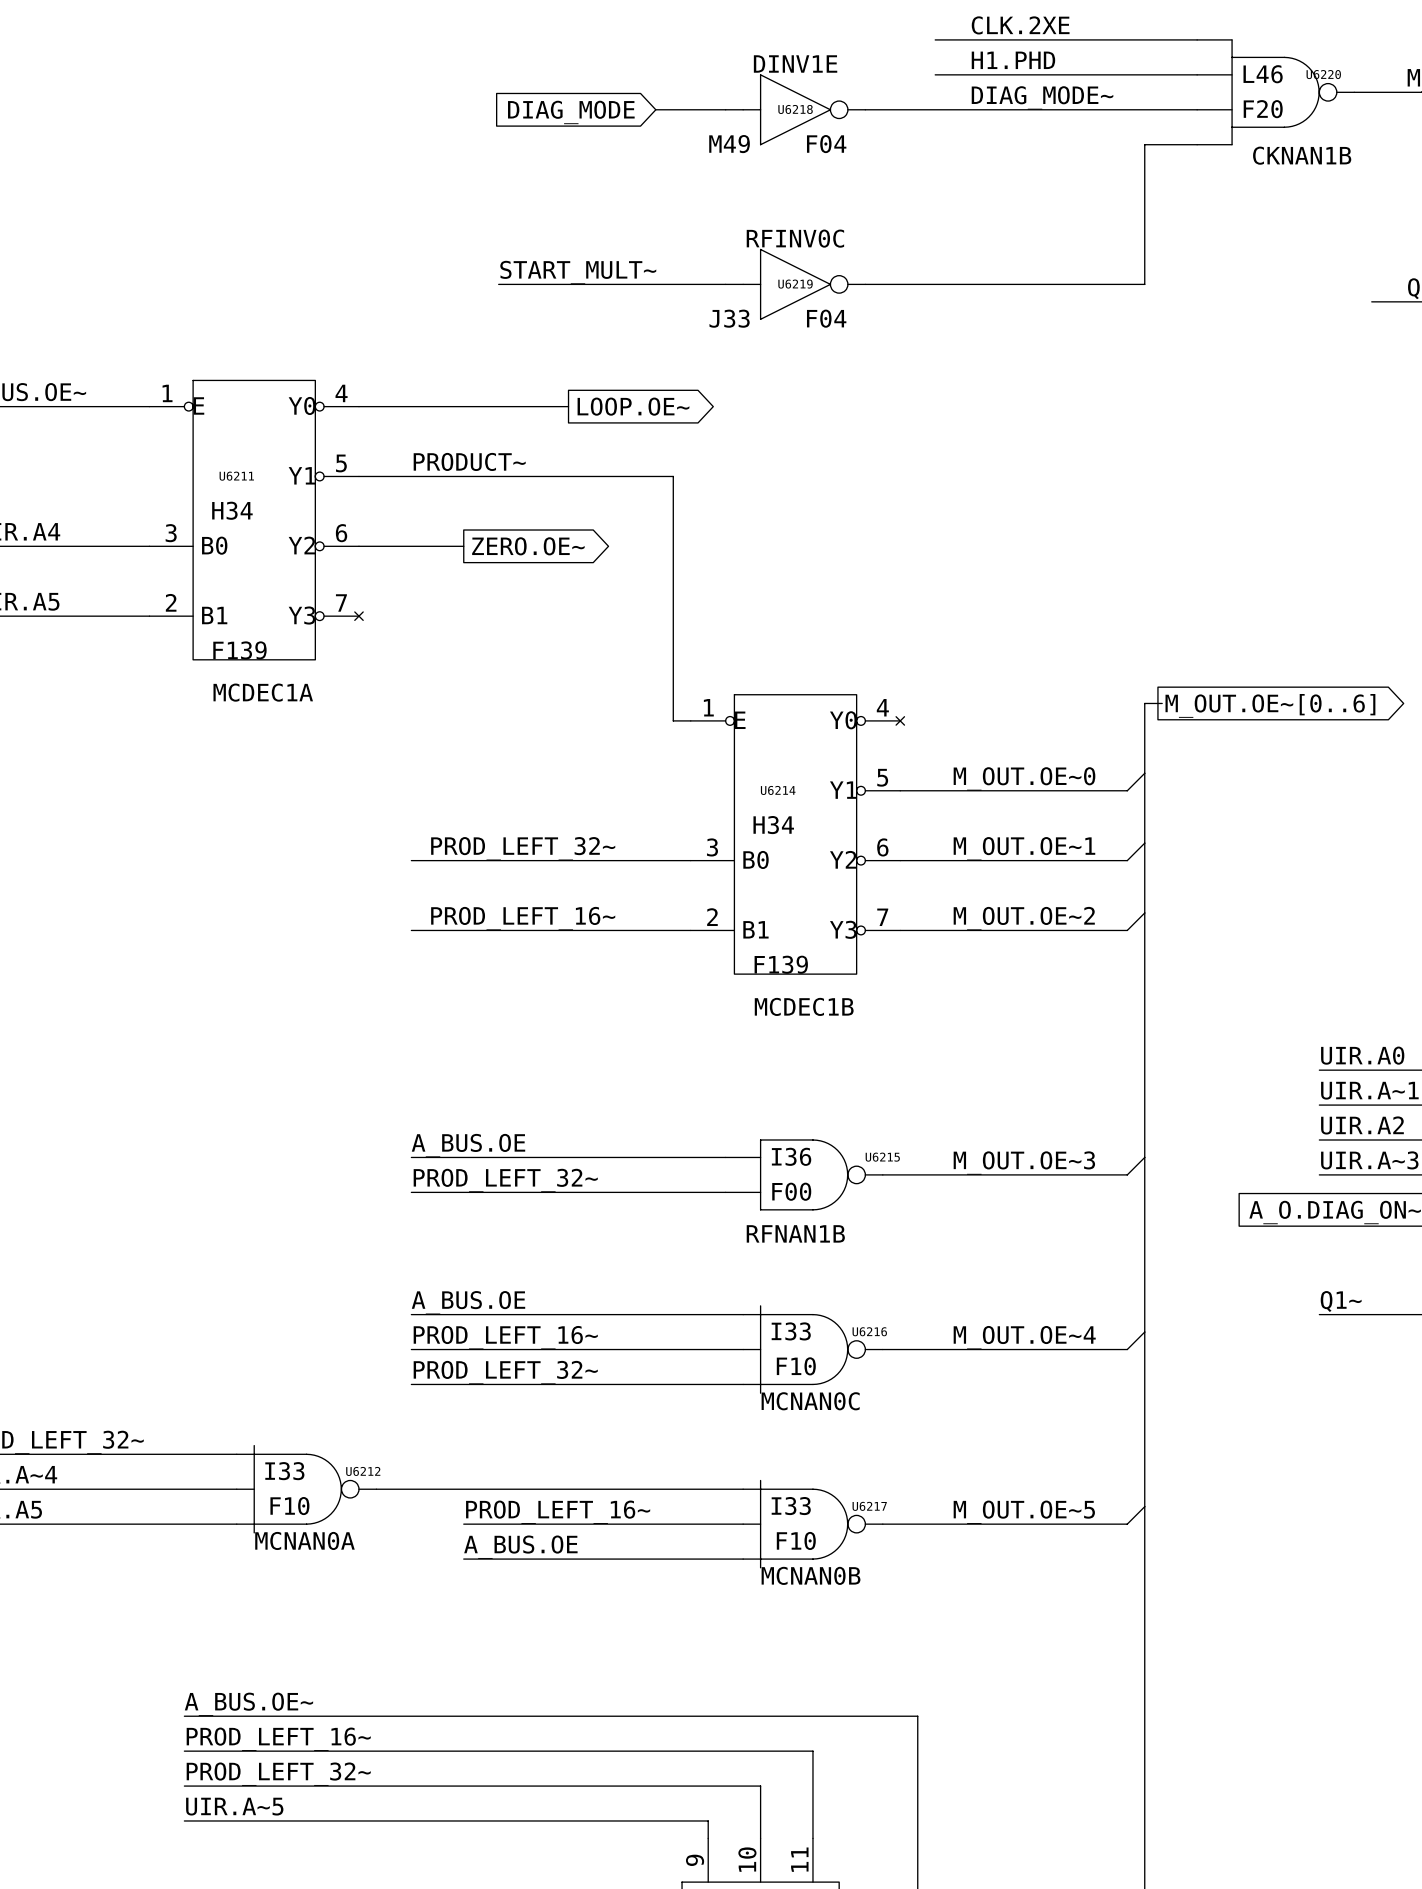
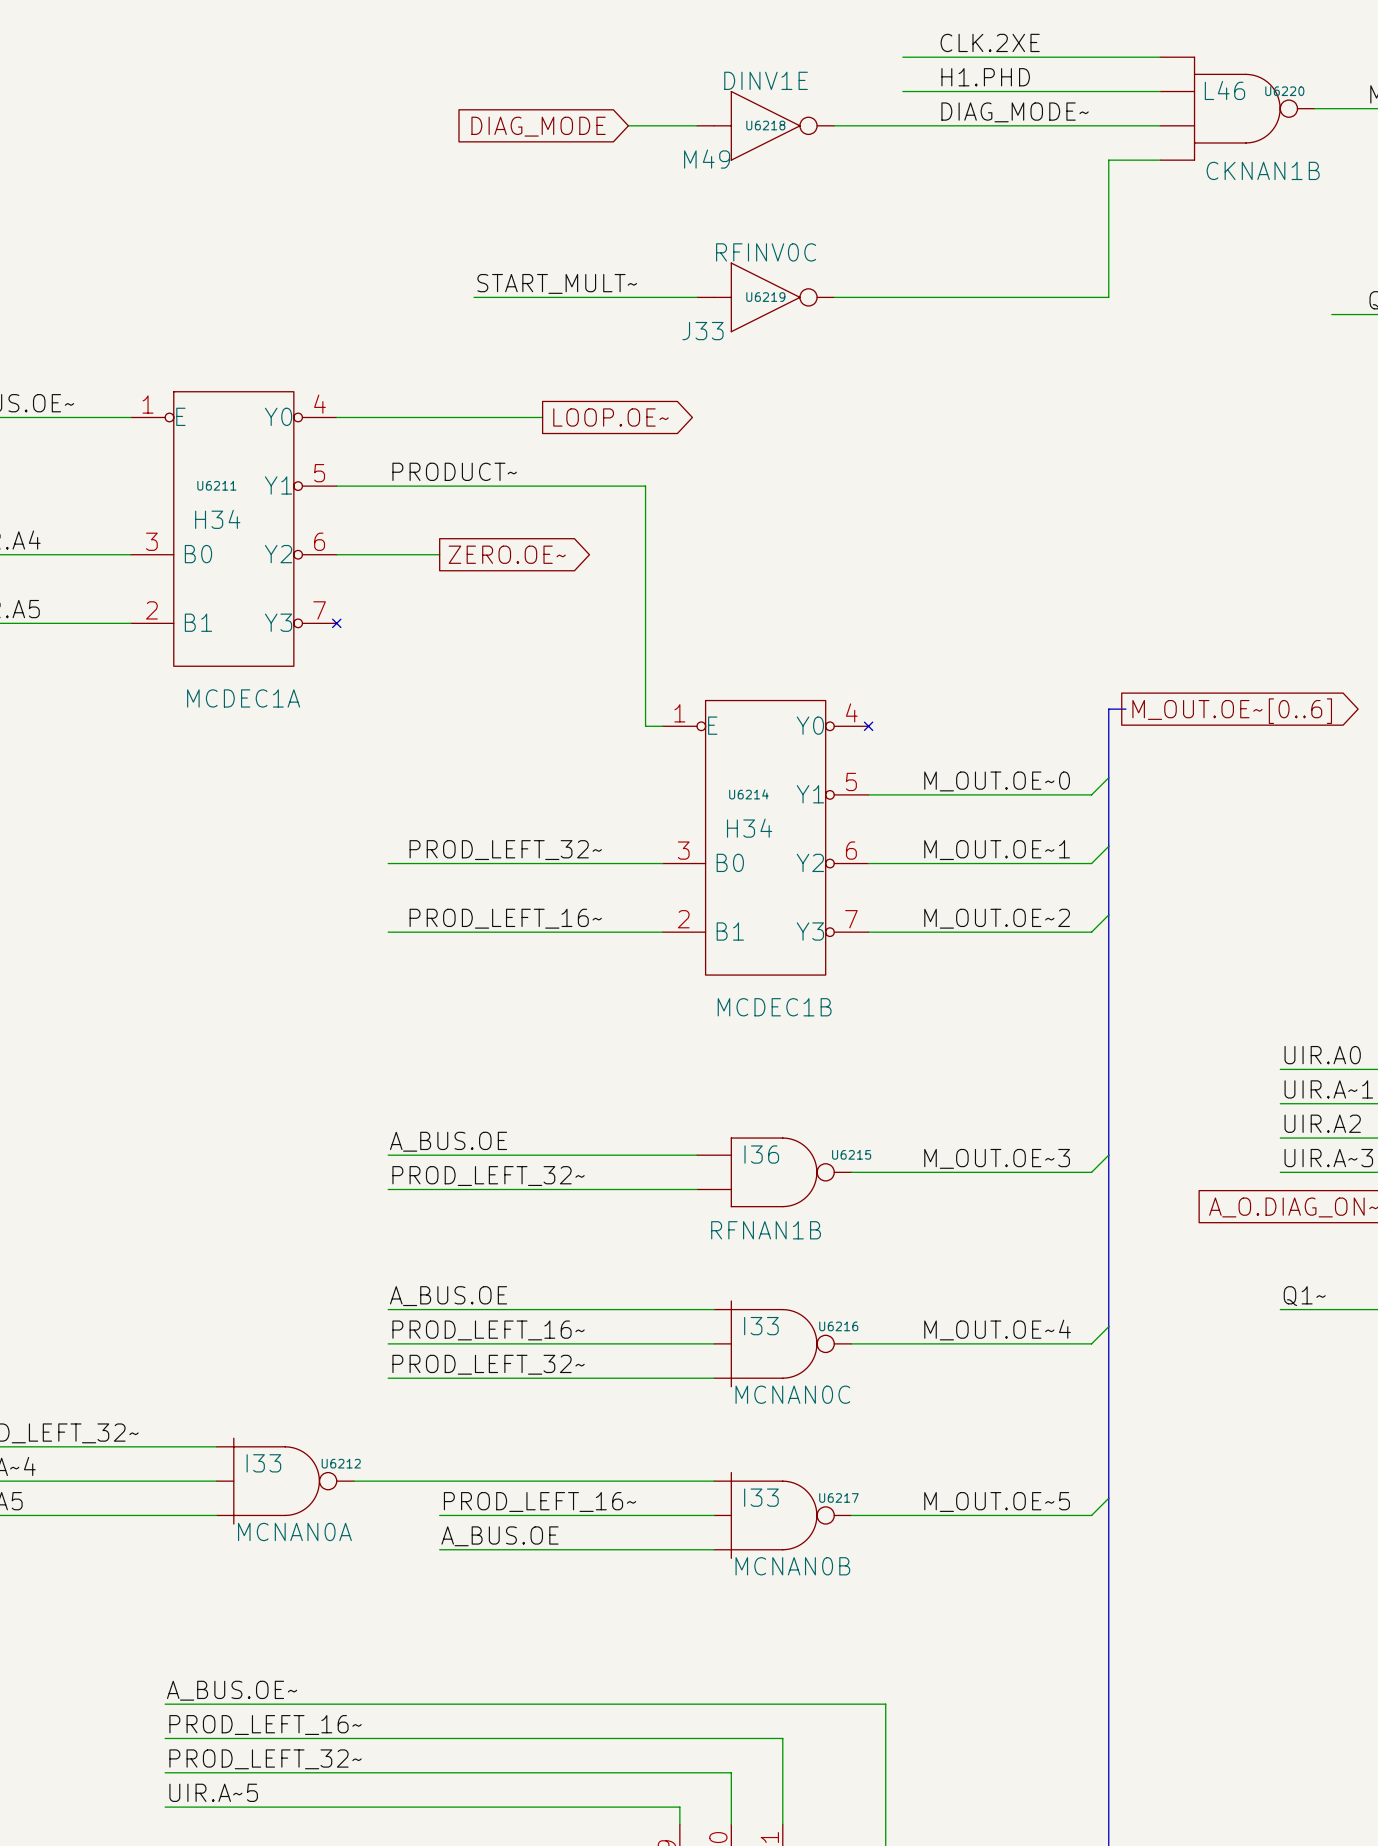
U6220 value: F20 (1263, 109) -> none
U6218 value: F04 (826, 144) -> none
U6219 value: F04 (826, 318) -> none
U6211 value: F139 (239, 650) -> none
U6214 value: F139 (781, 964) -> none
U6215 value: F00 (791, 1191) -> none
U6216 value: F10 (796, 1366) -> none
U6212 value: F10 (289, 1506) -> none
U6217 value: F10 (796, 1540) -> none

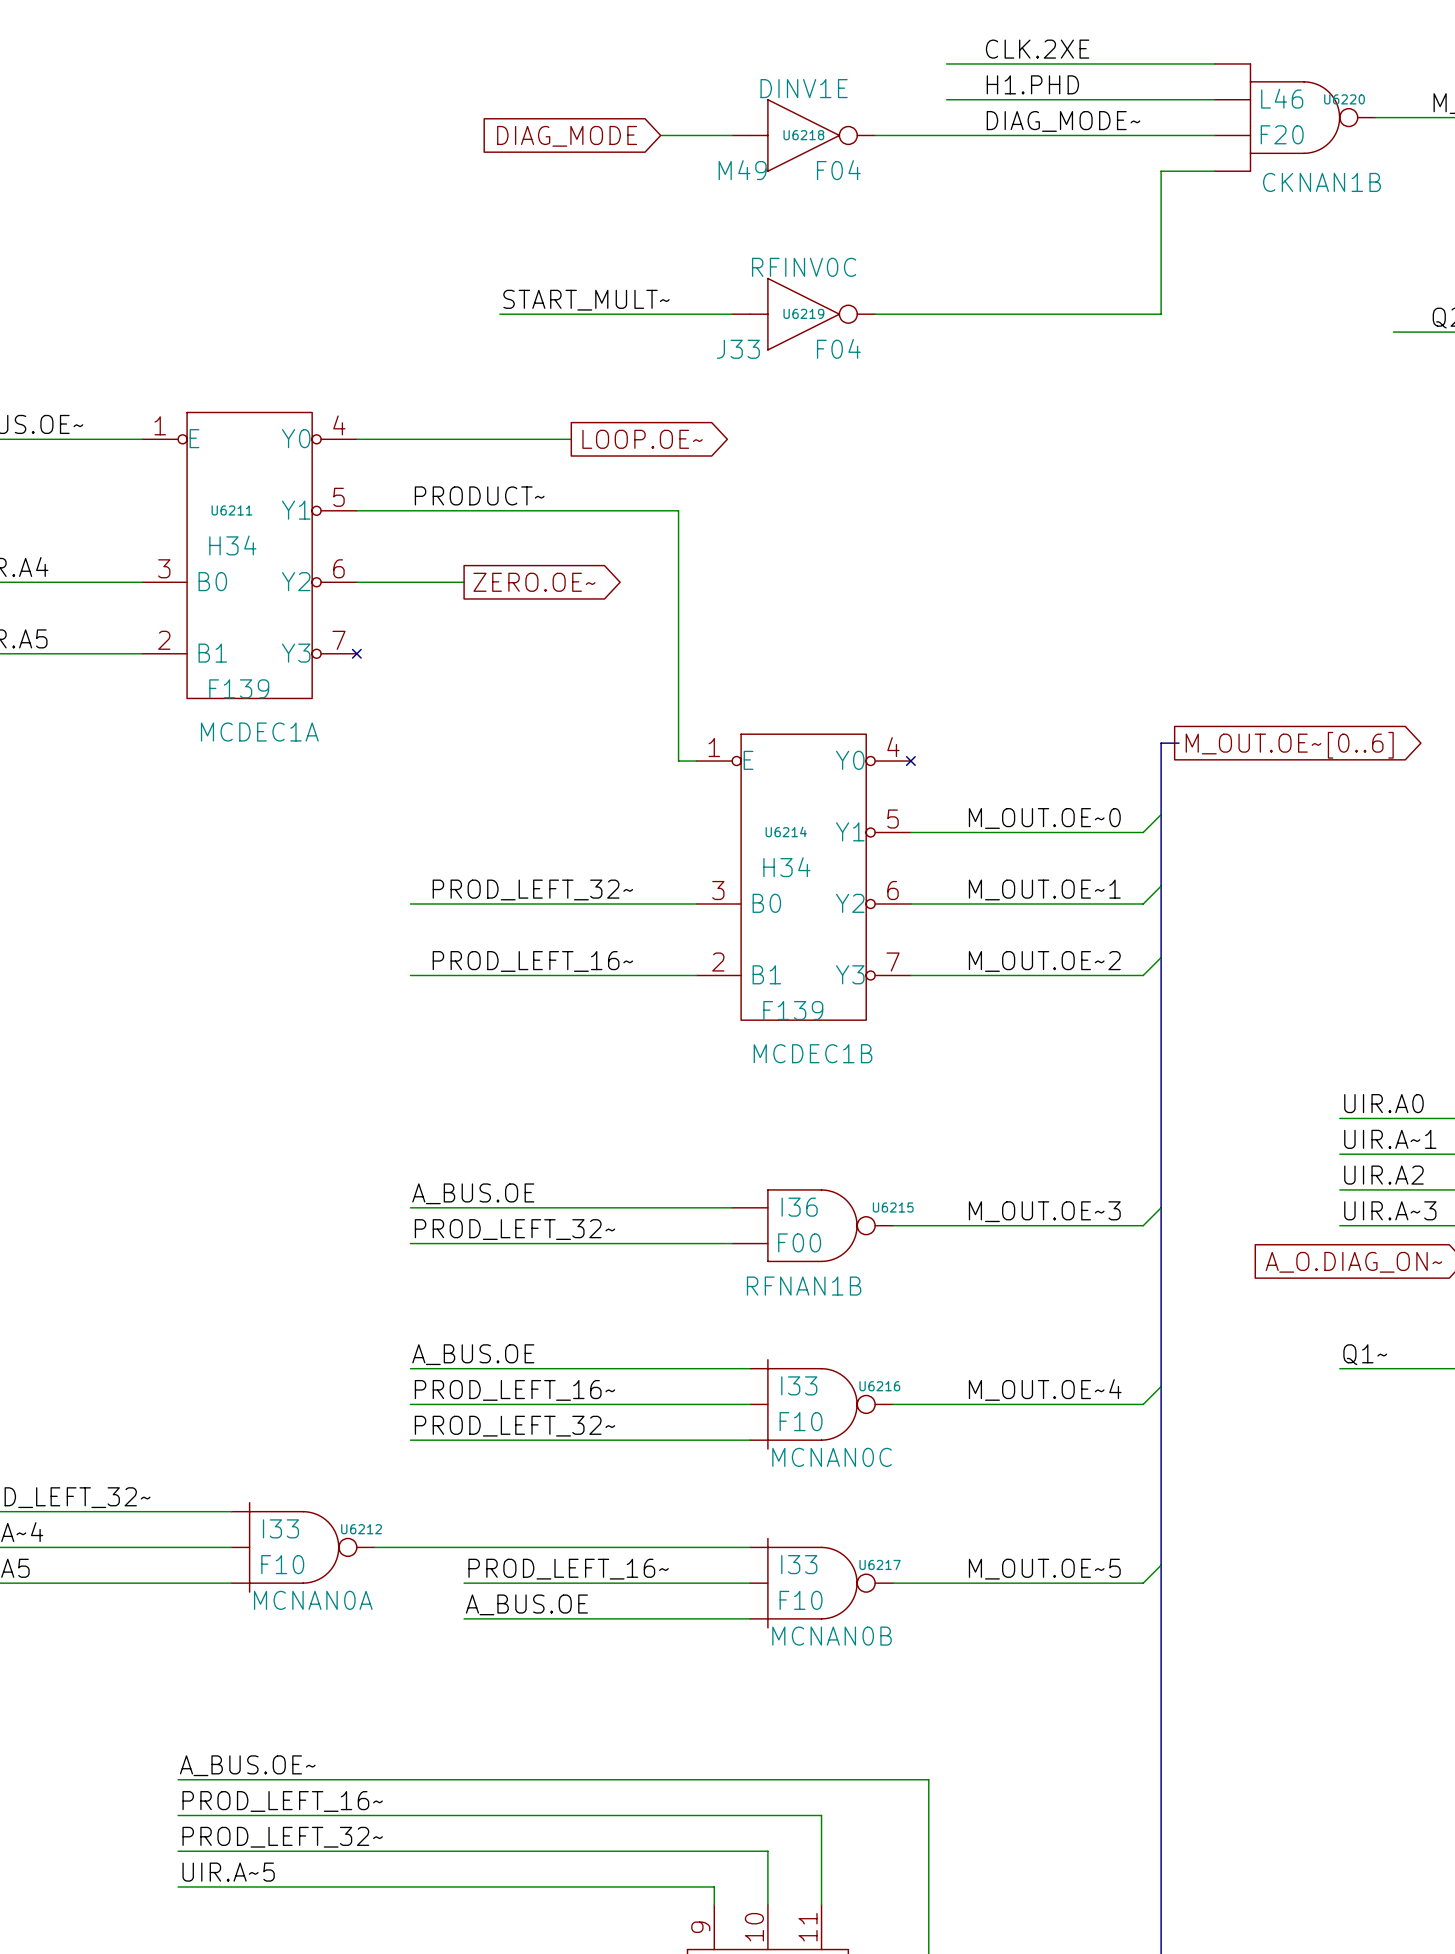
U6220 value: none -> F20 (1282, 134)
U6218 value: none -> F04 (838, 170)
U6219 value: none -> F04 (838, 348)
U6211 value: none -> F139 (239, 688)
U6214 value: none -> F139 (793, 1010)
U6215 value: none -> F00 (799, 1242)
U6216 value: none -> F10 (801, 1421)
U6212 value: none -> F10 (282, 1564)
U6217 value: none -> F10 (801, 1600)

